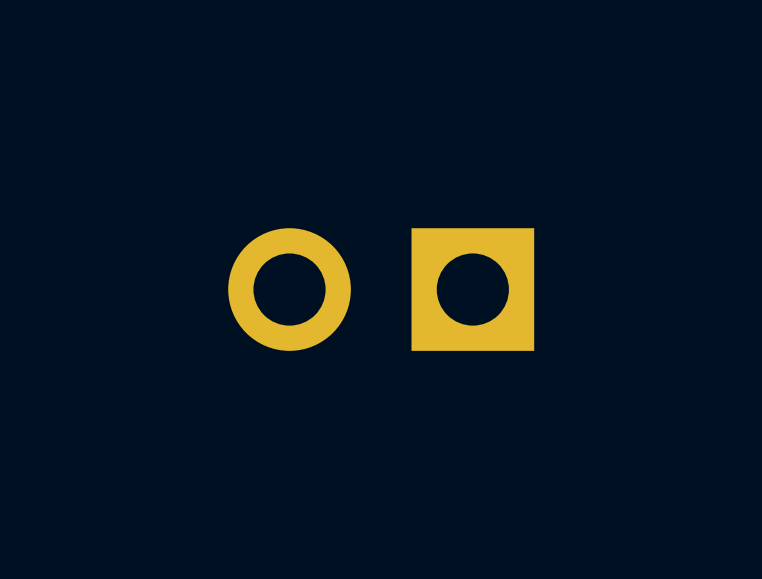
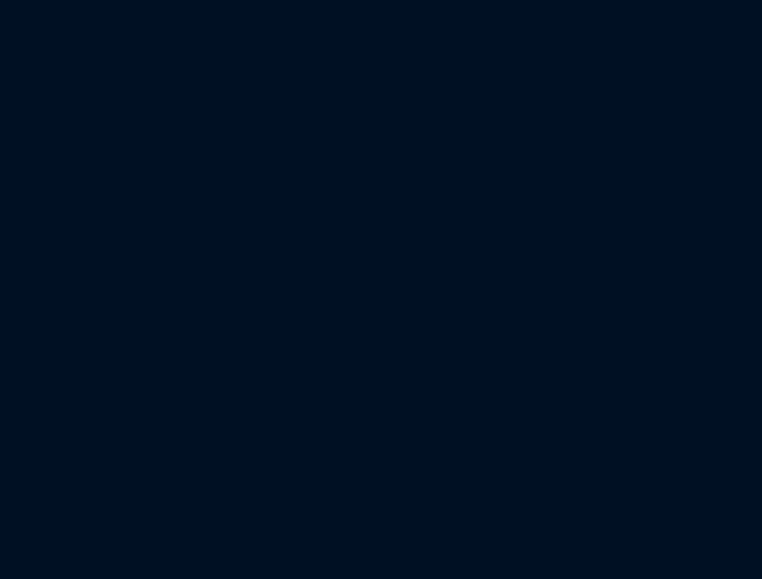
part: (381, 289) -> none

